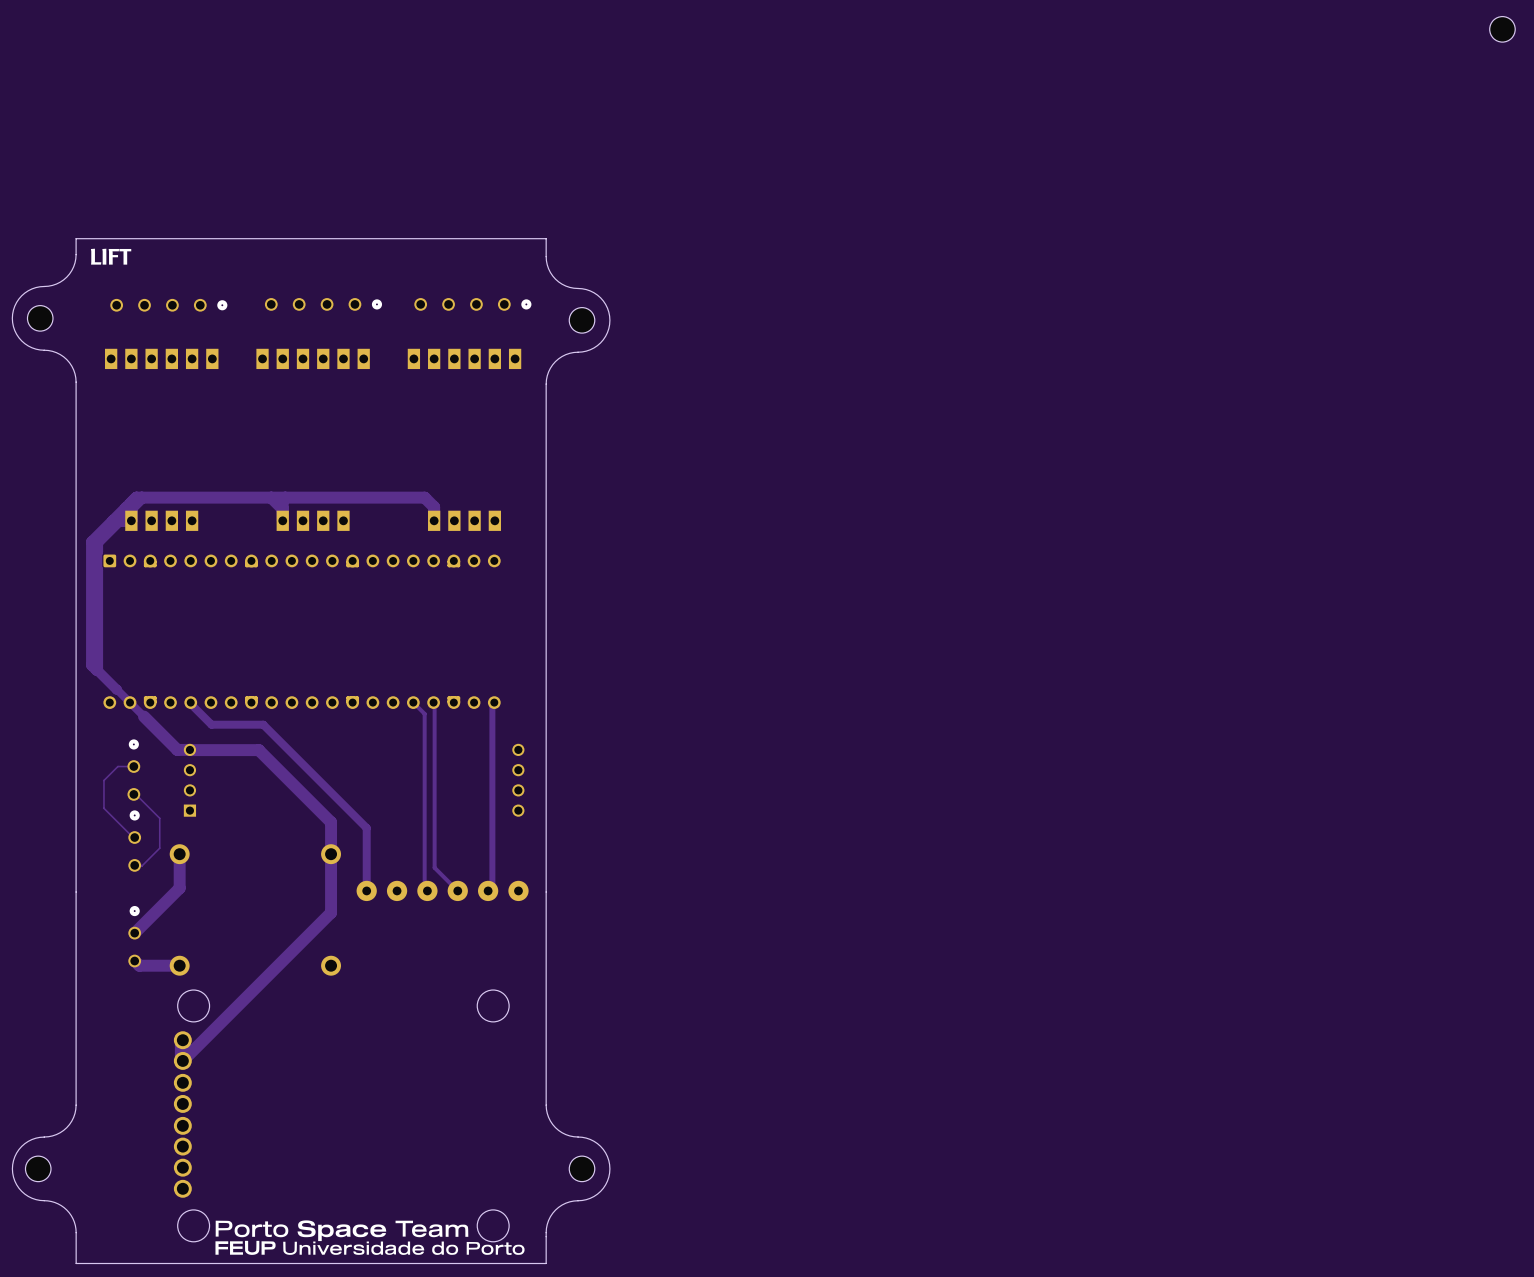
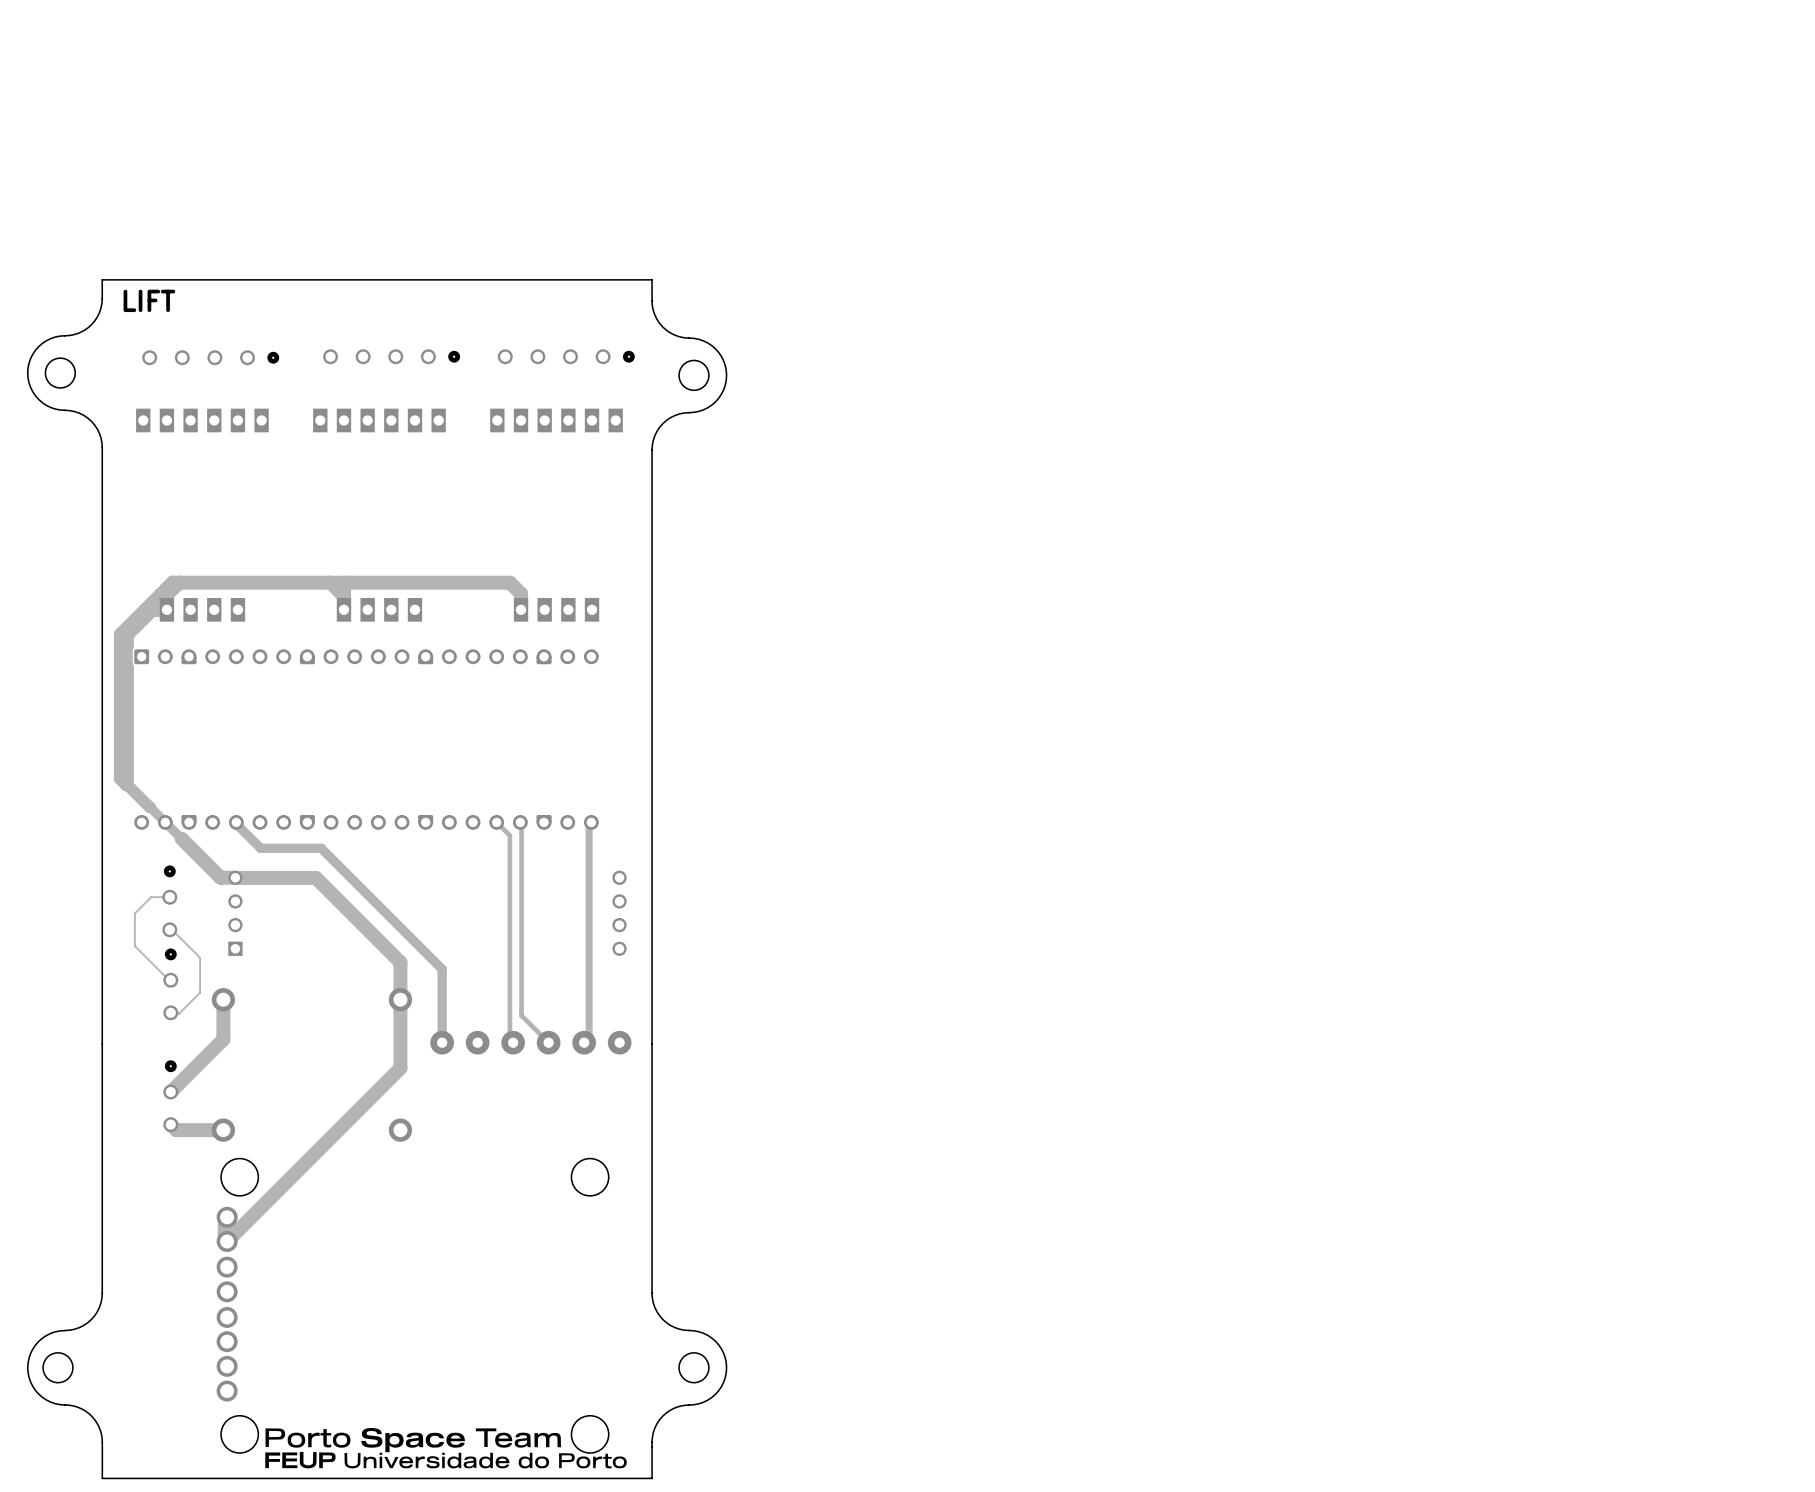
part: (1502, 29) -> none

